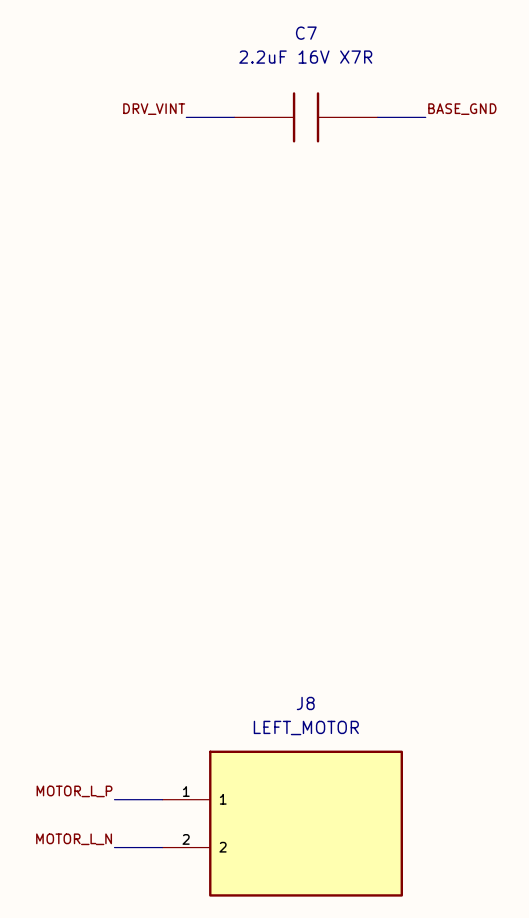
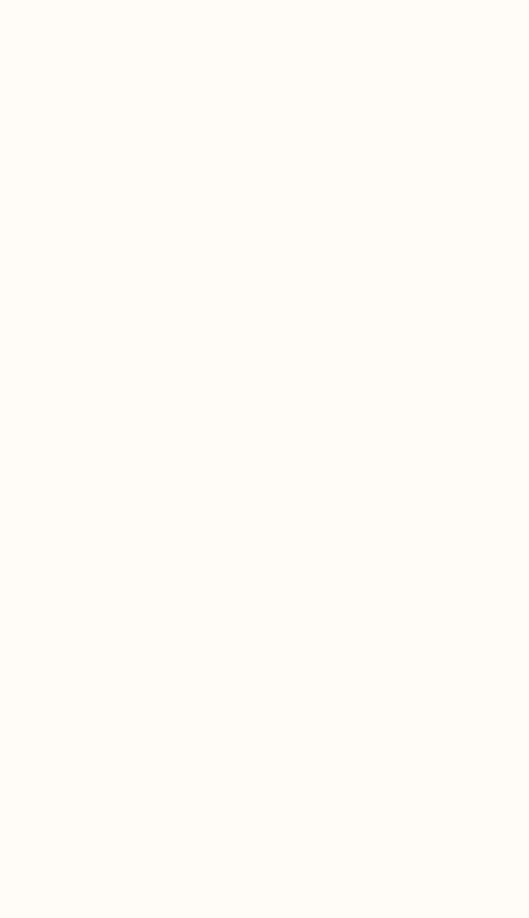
label: DRV_VINT (154, 109) -> none
label: BASE_GND (462, 109) -> none
wire: (186, 117) (234, 117) -> none
C7: 2.2uF 16V X7R (306, 117) -> none
wire: (377, 117) (425, 117) -> none
label: MOTOR_L_P (74, 791) -> none
wire: (114, 799) (162, 799) -> none
J8: LEFT_MOTOR (282, 823) -> none
label: MOTOR_L_N (74, 839) -> none
wire: (114, 847) (162, 847) -> none

